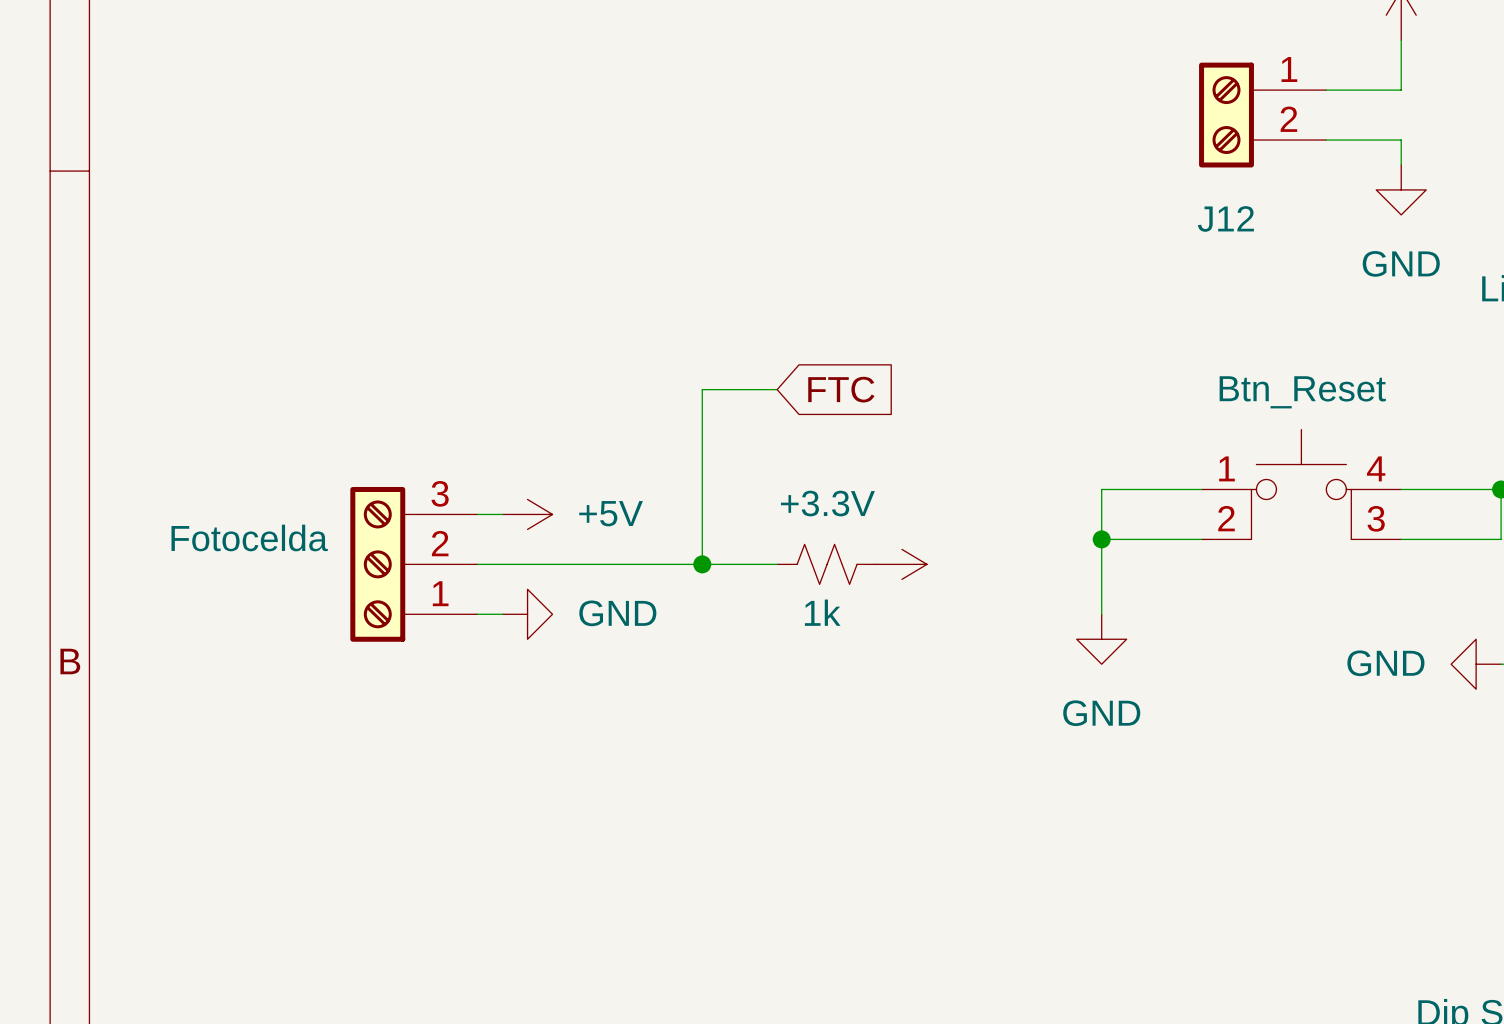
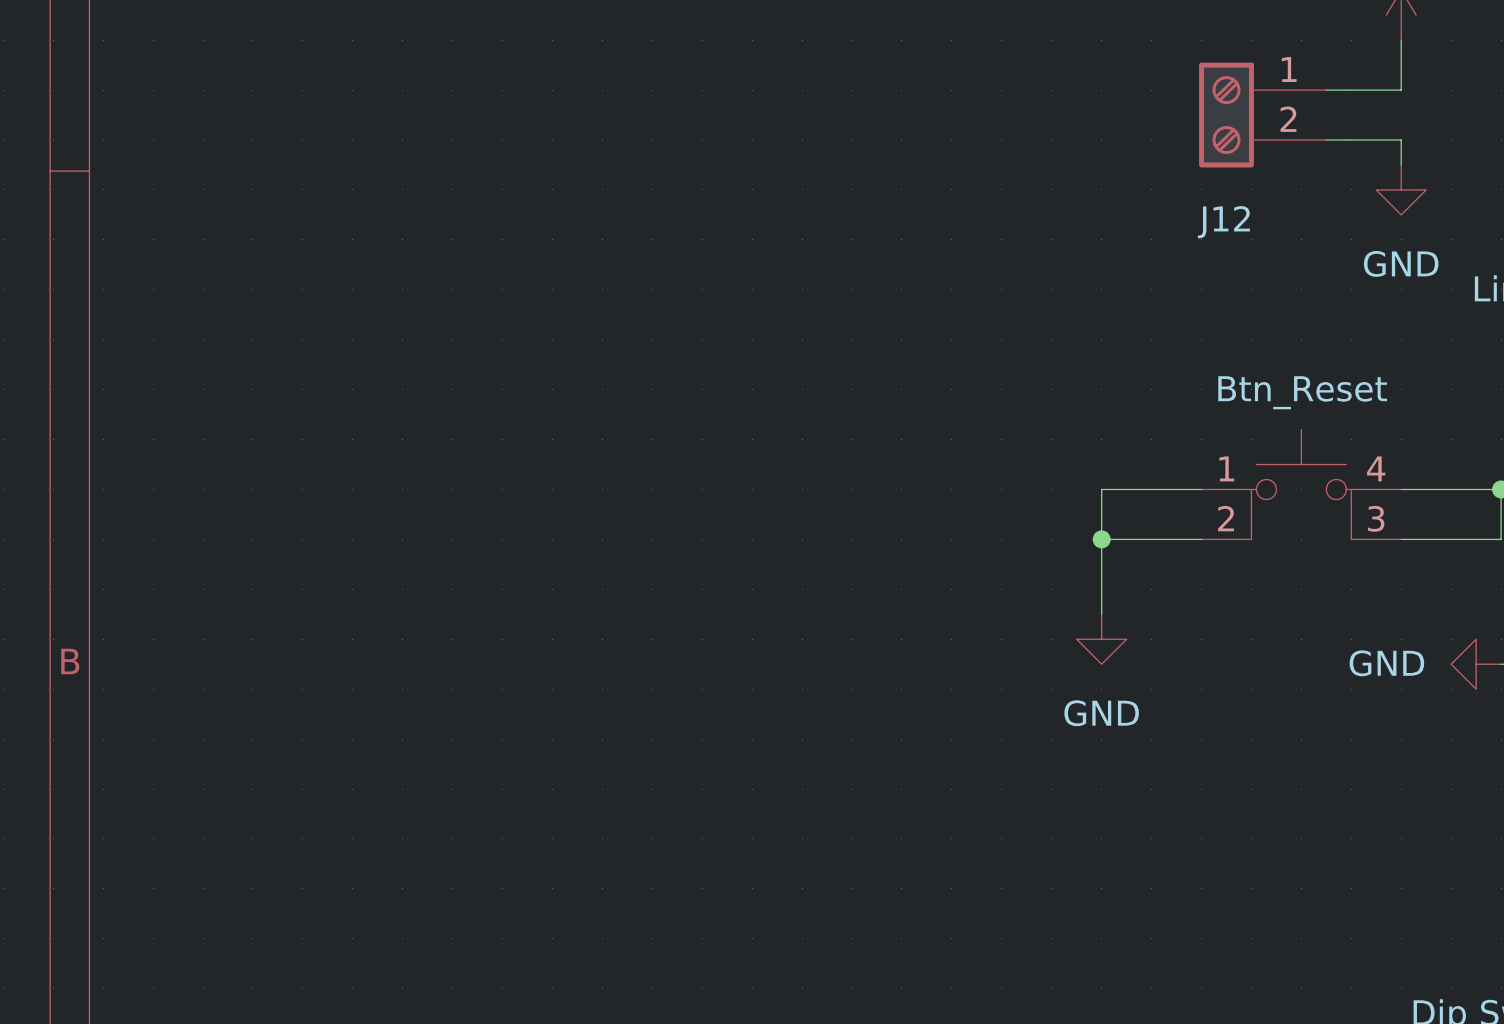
wire: (777, 389) (702, 389) (702, 564) -> none
global label: FTC (841, 389) -> none
wire: (477, 514) (502, 514) -> none
power symbol: +5V (527, 514) -> none
part: Fotocelda (413, 564) -> none
wire: (477, 564) (777, 564) -> none
junction: (702, 564) -> none
part: 1k (827, 564) -> none
power symbol: +3.3V (901, 564) -> none
wire: (477, 614) (502, 614) -> none
power symbol: GND (527, 614) -> none

